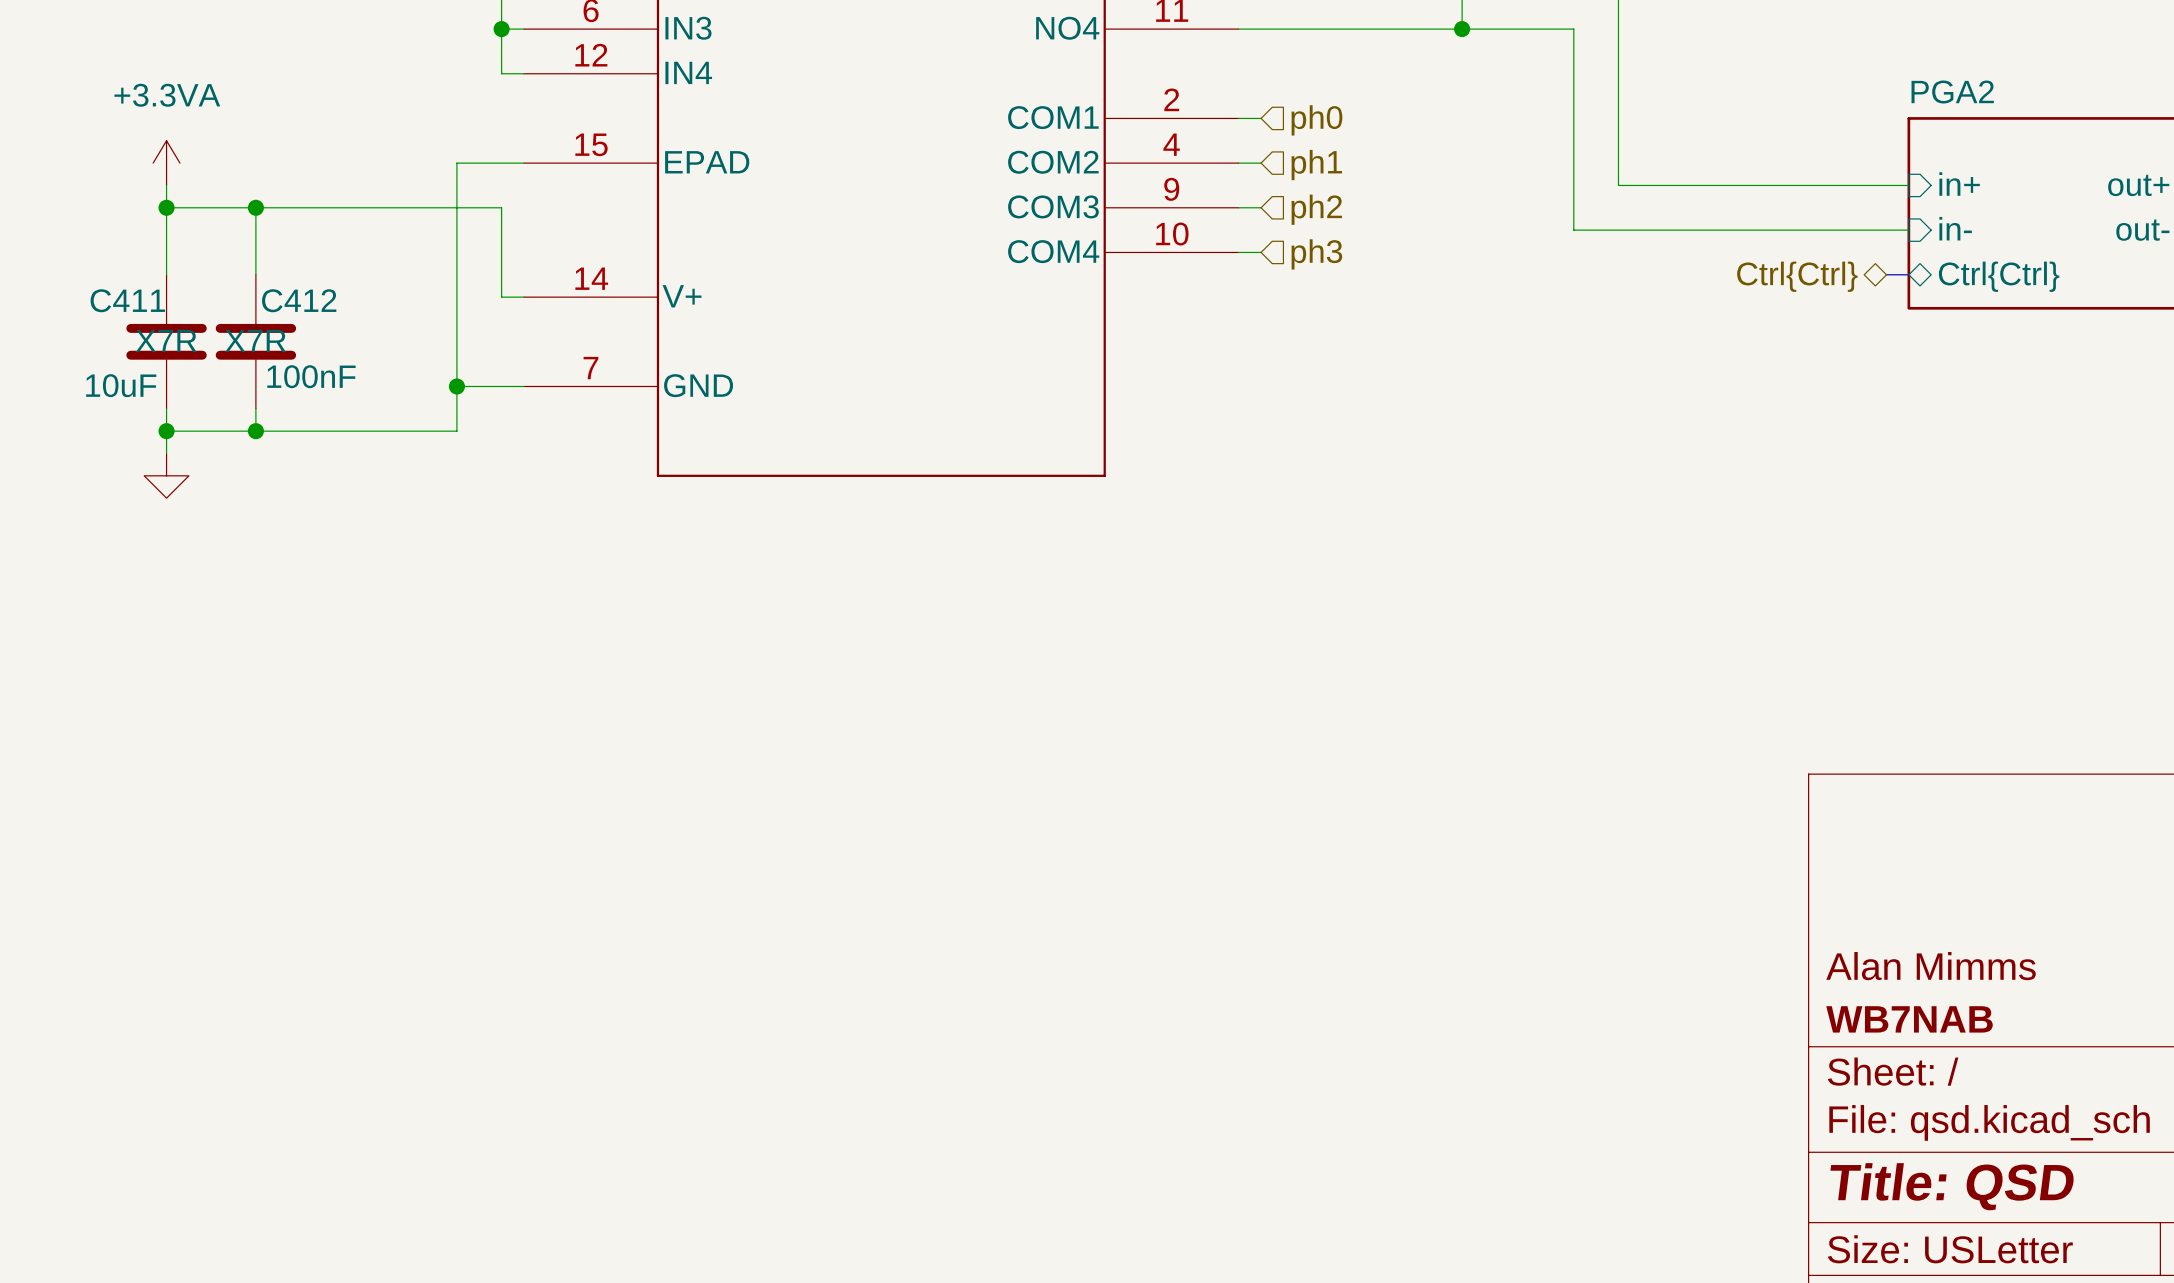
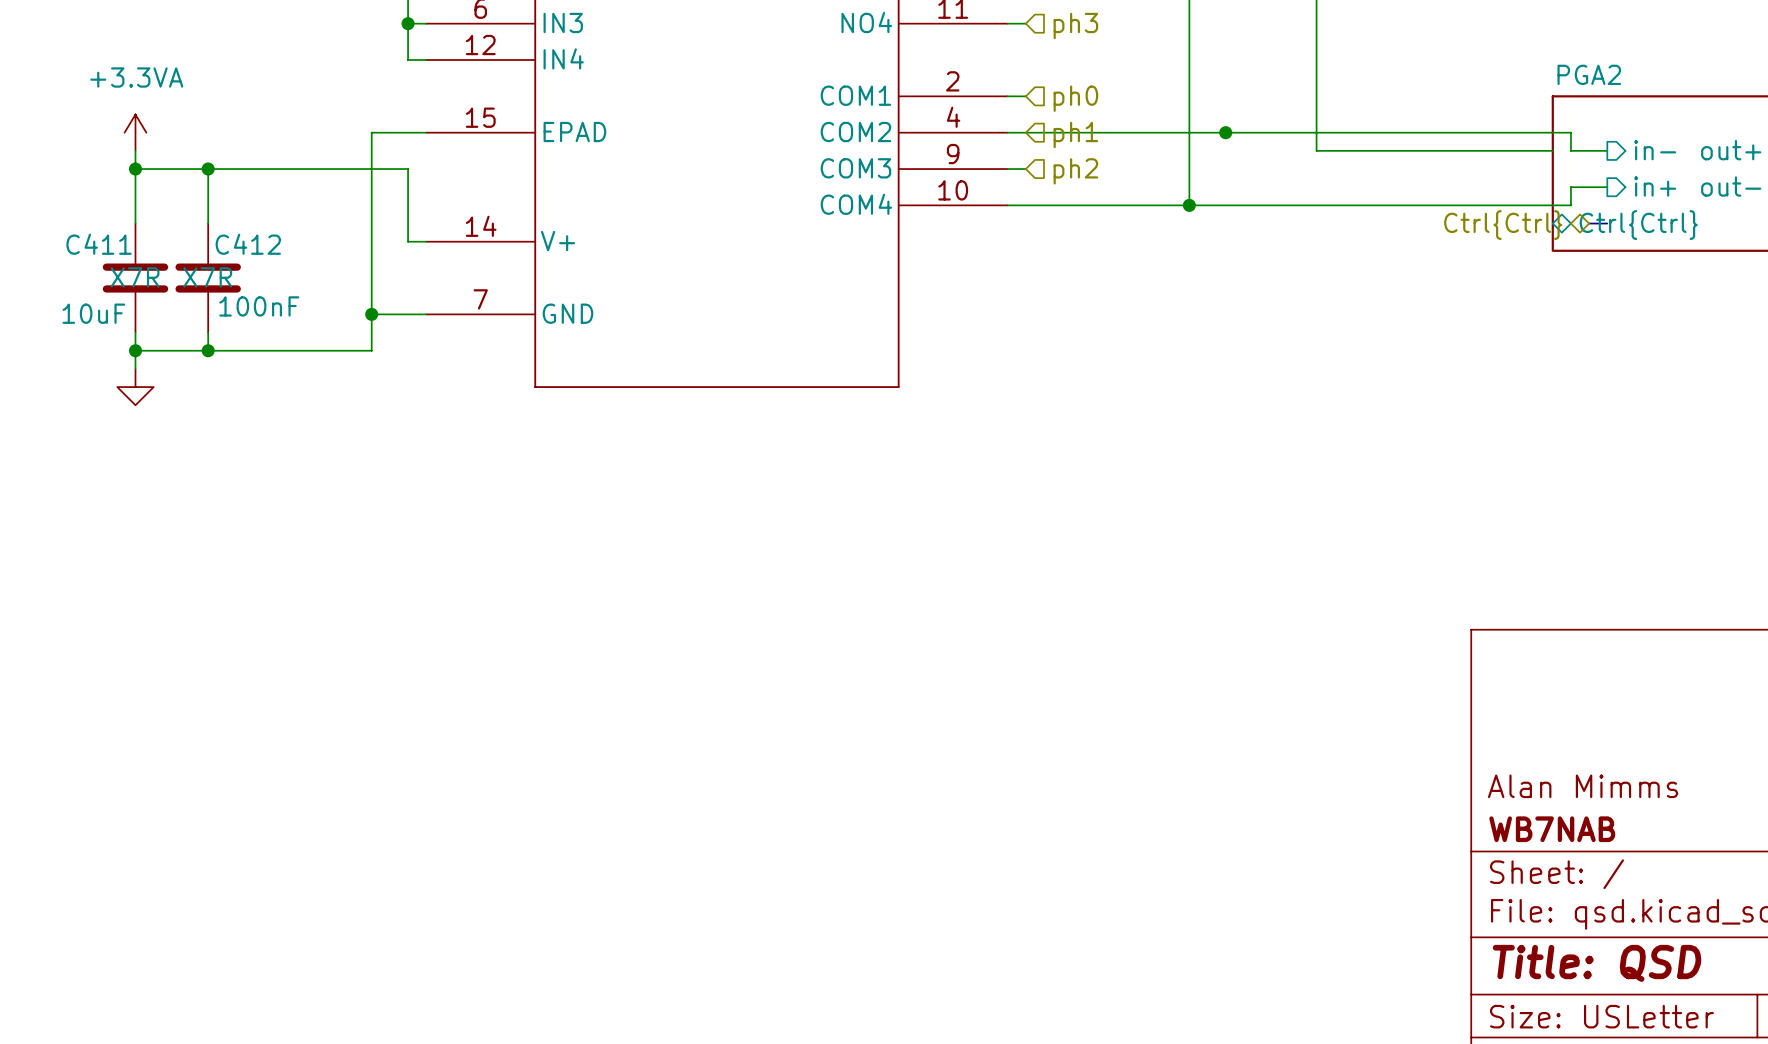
wire: (1261, 29) (1573, 29) (1573, 230) (1908, 230) -> none
wire: none -> (1189, 23) (1189, 205)
junction: (1462, 29) -> none
wire: none -> (1025, 132) (1570, 132) (1570, 150) (1607, 150)
junction: none -> (1225, 132)
sheet pin position: in+ (1959, 184) -> in+ (1655, 186)
sheet pin position: in- (1955, 228) -> in- (1655, 150)
wire: none -> (1607, 187) (1570, 187) (1570, 205) (1025, 205)
junction: none -> (1189, 205)
hierarchical label position: ph3 (1316, 254) -> ph3 (1075, 26)
bus: (1886, 274) (1908, 274) -> (1589, 223) (1607, 223)
hierarchical label position: Ctrl{Ctrl} (1797, 276) -> Ctrl{Ctrl} (1503, 225)

